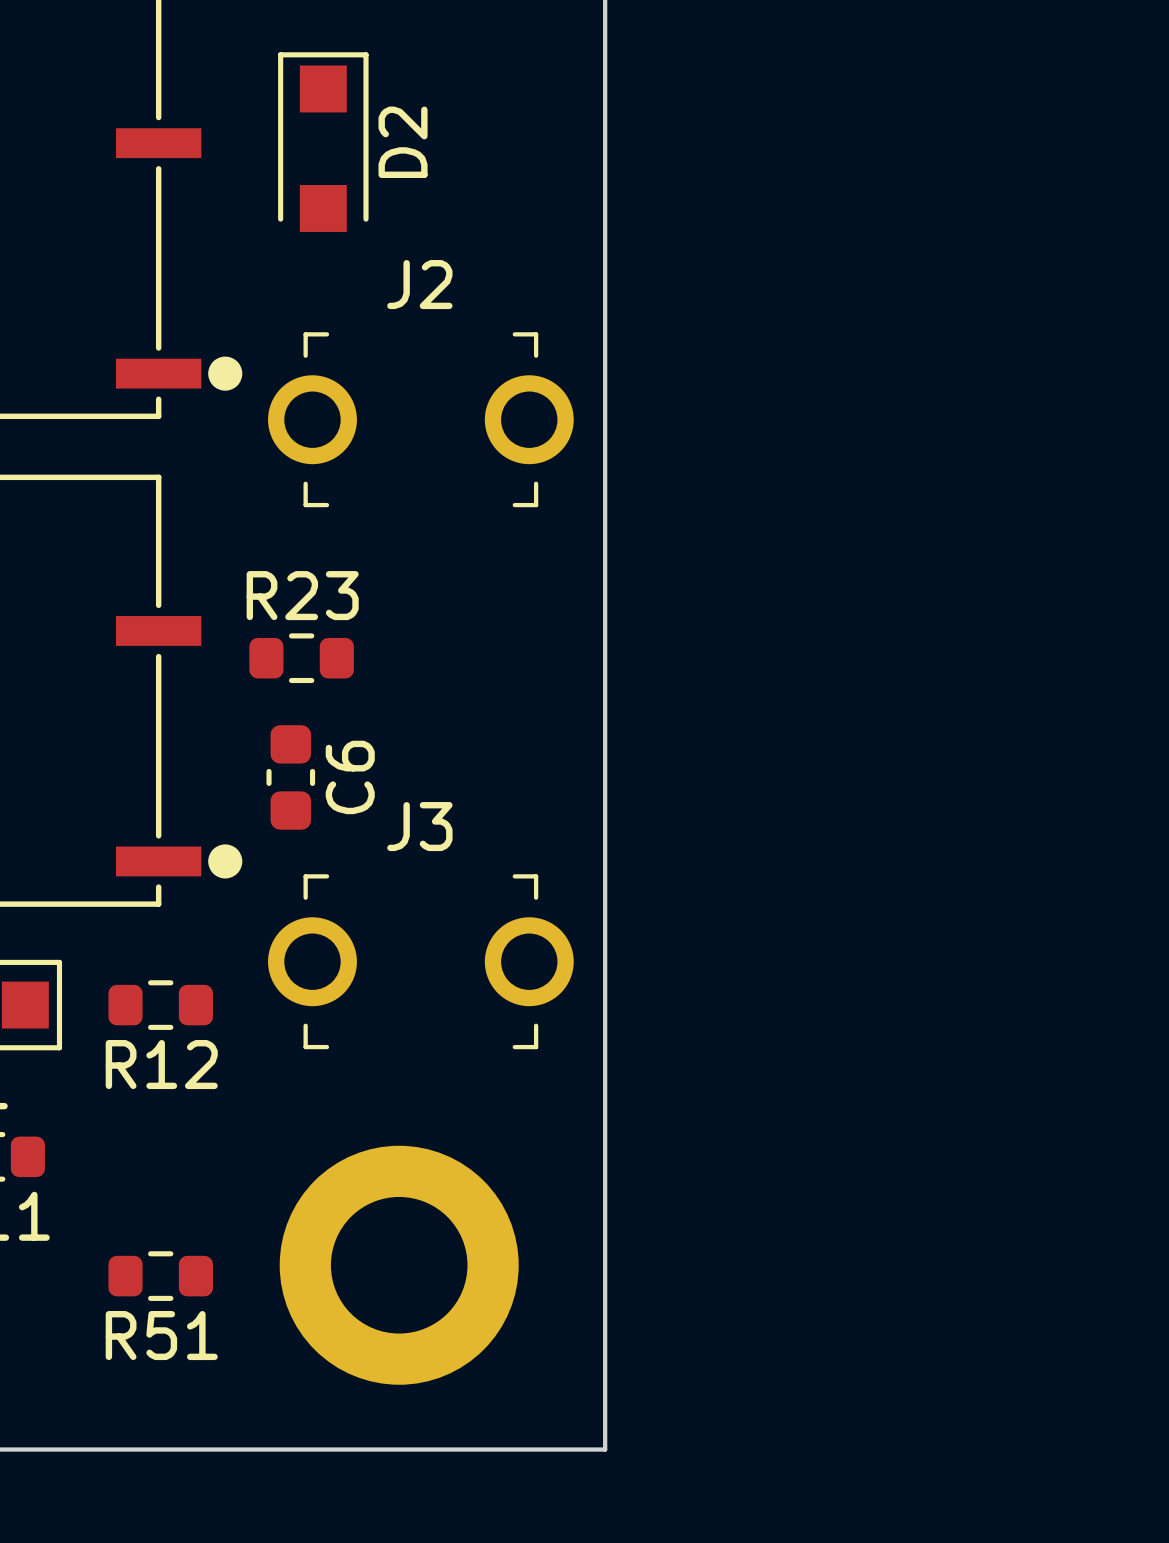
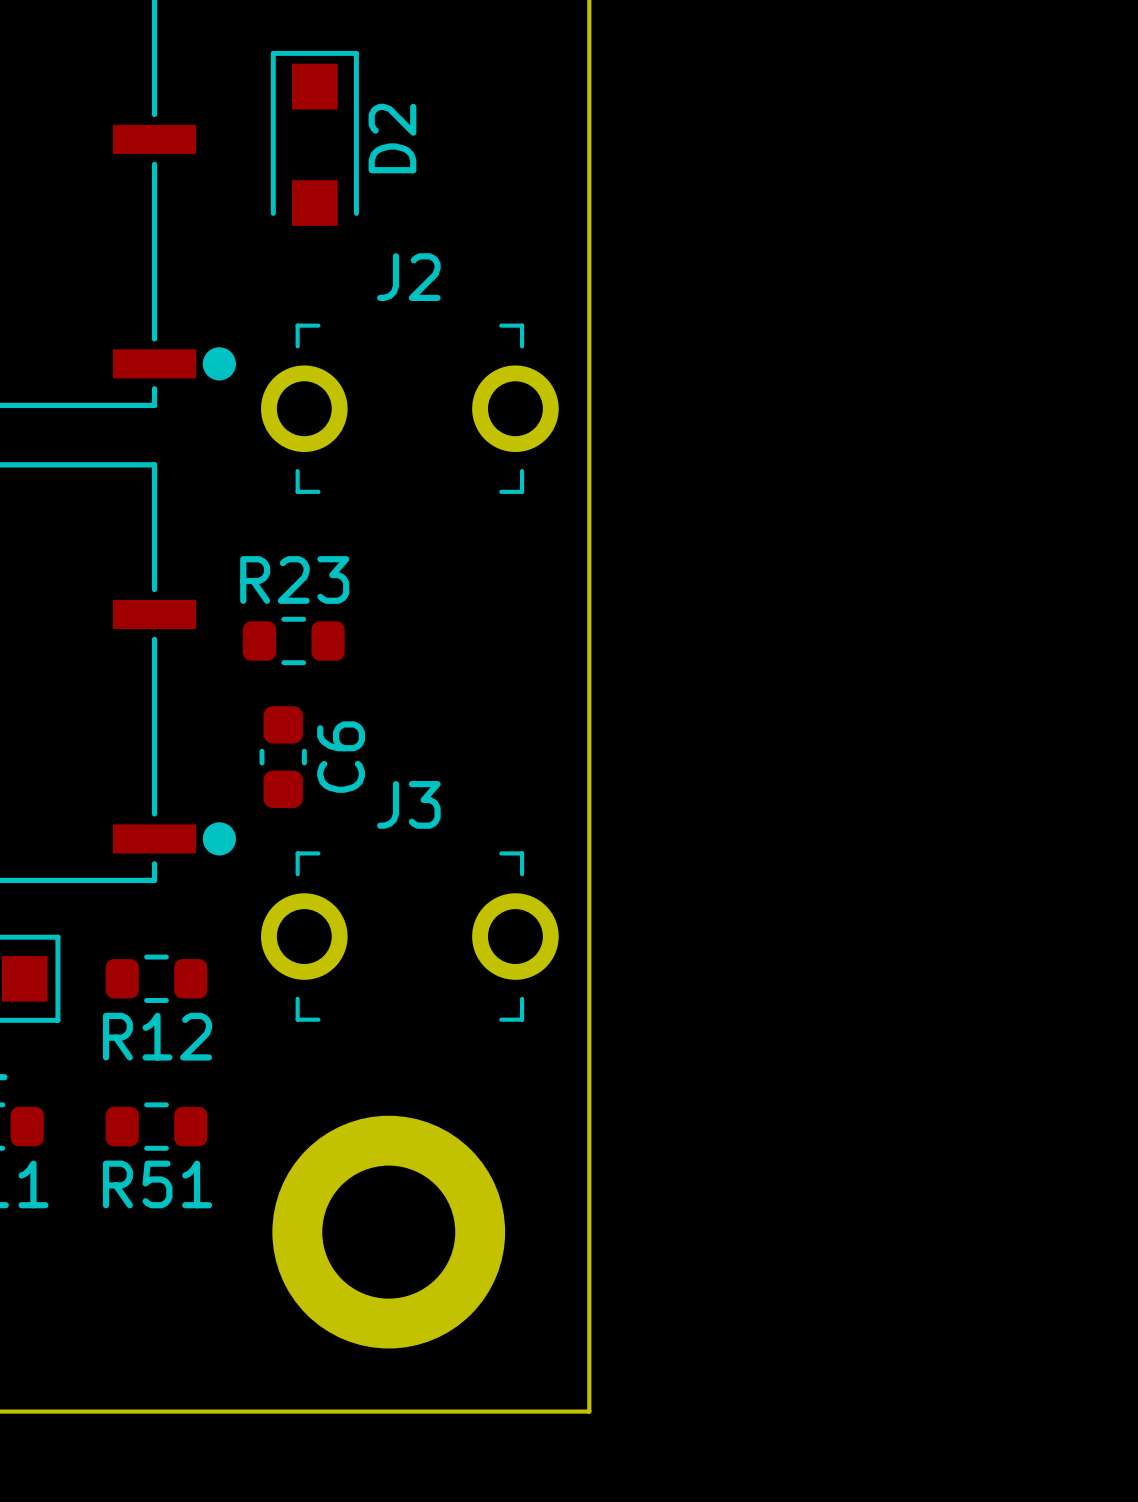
R51 position: (160, 1276) -> (156, 1126)

